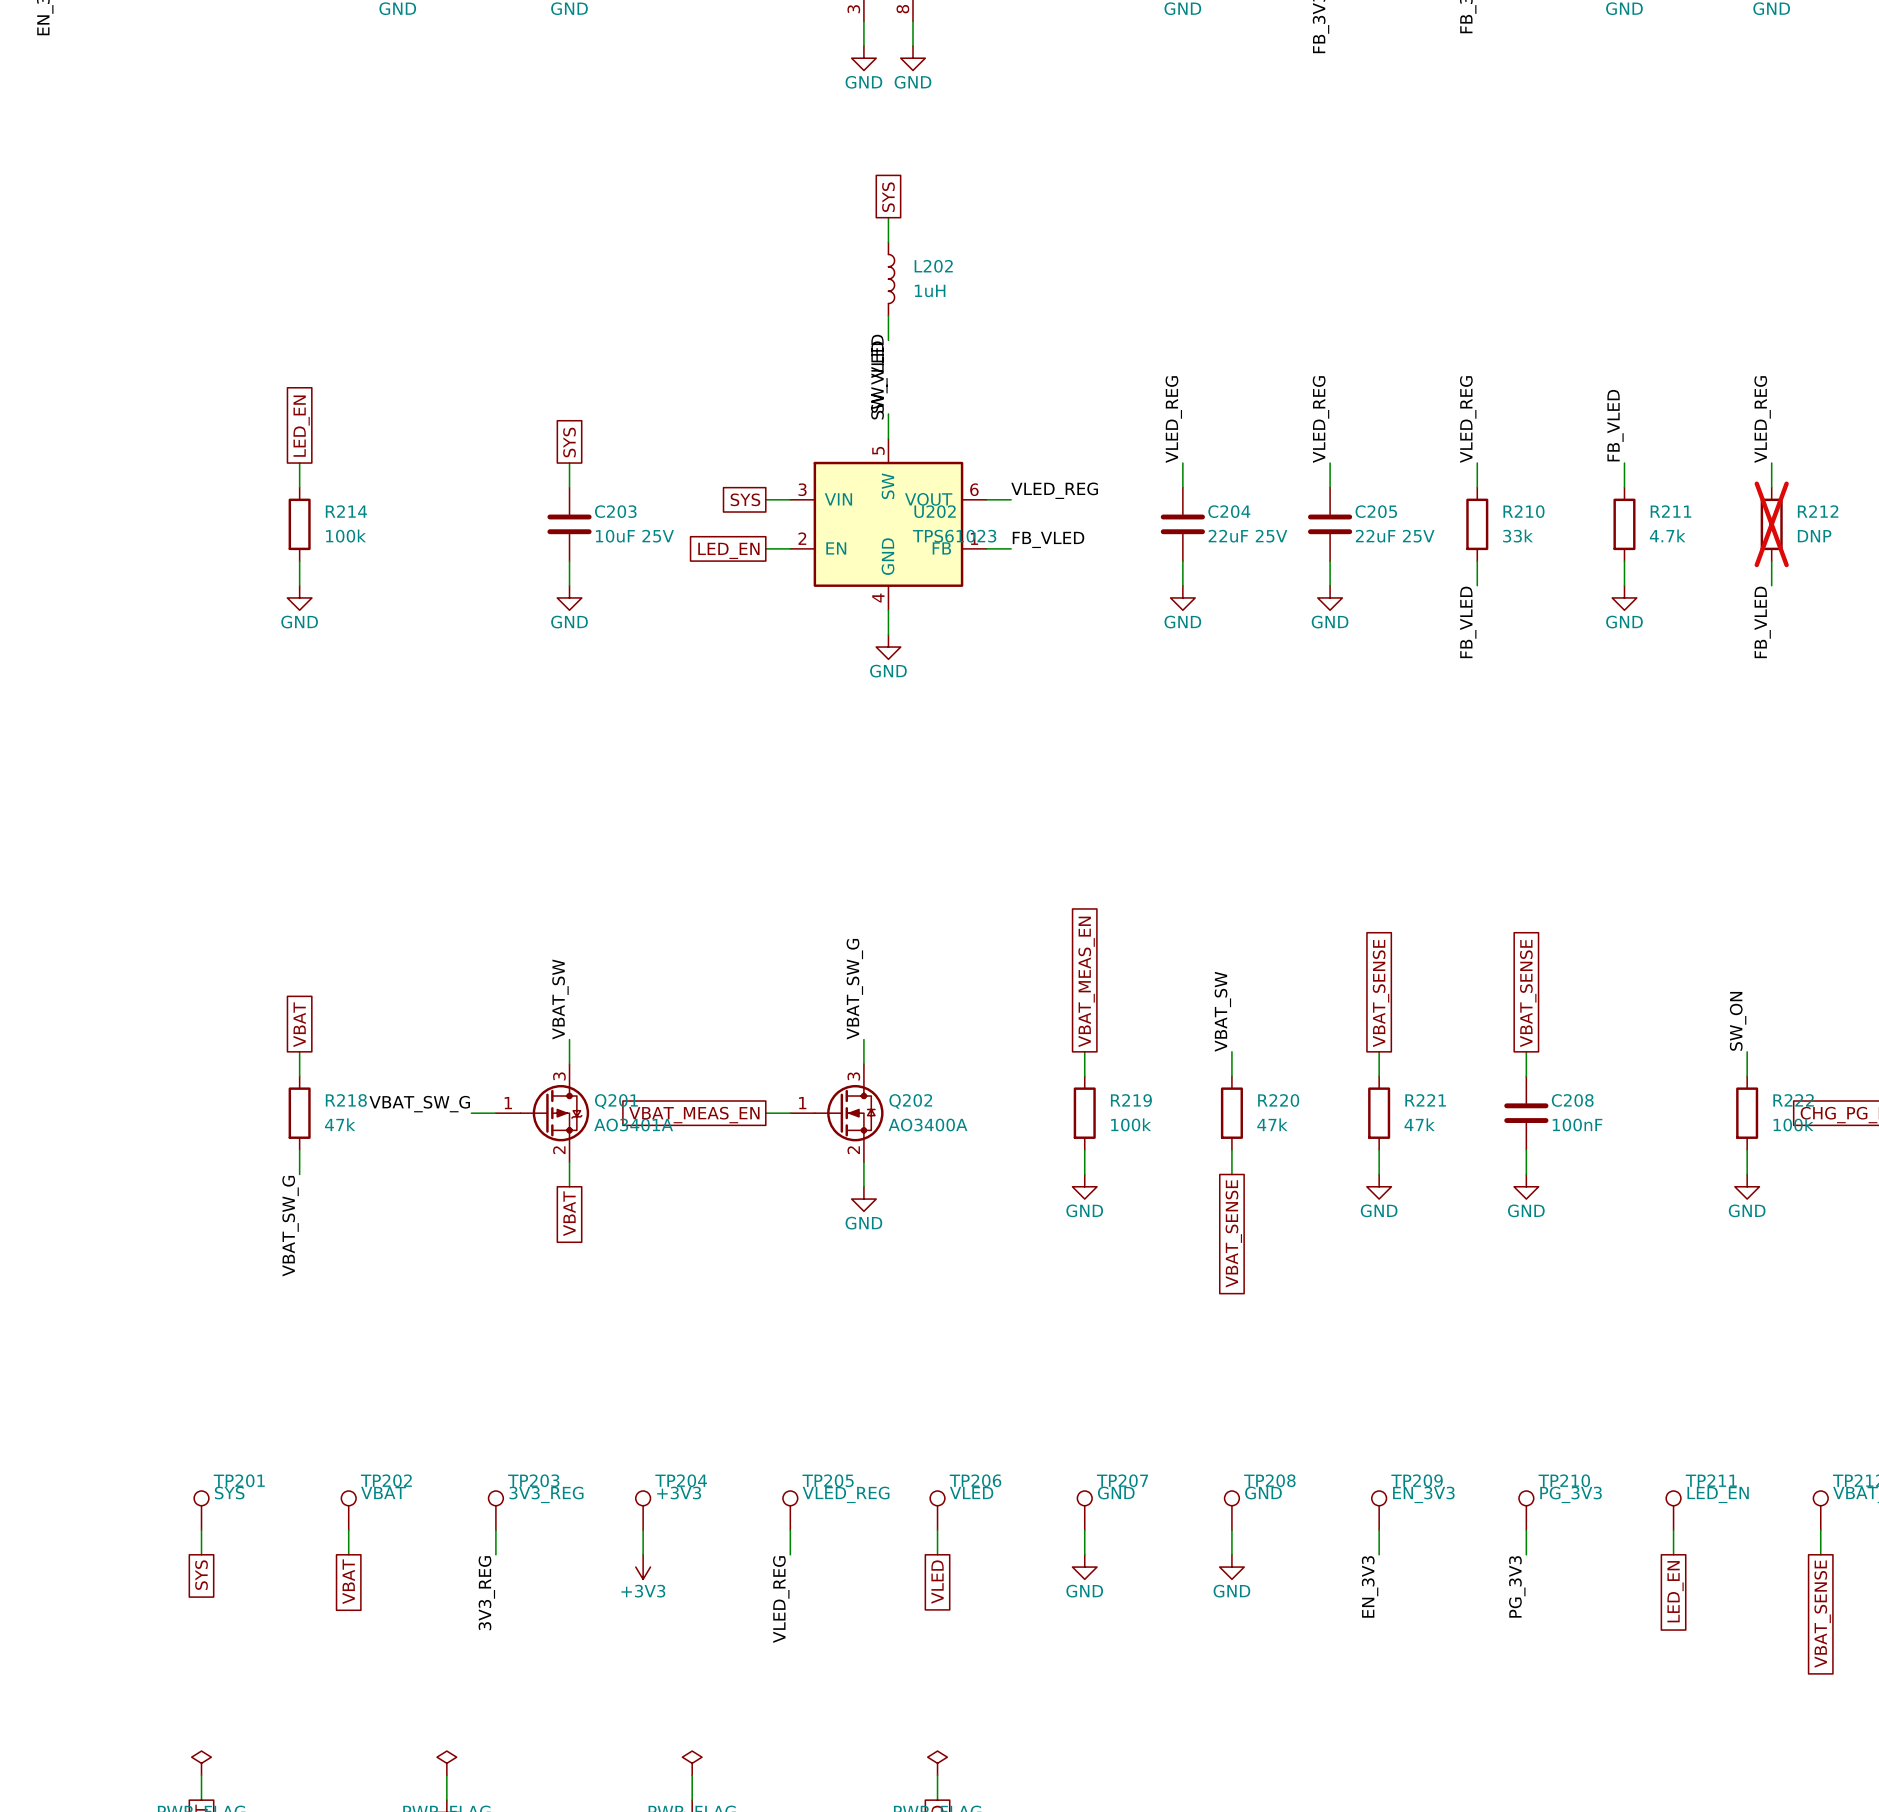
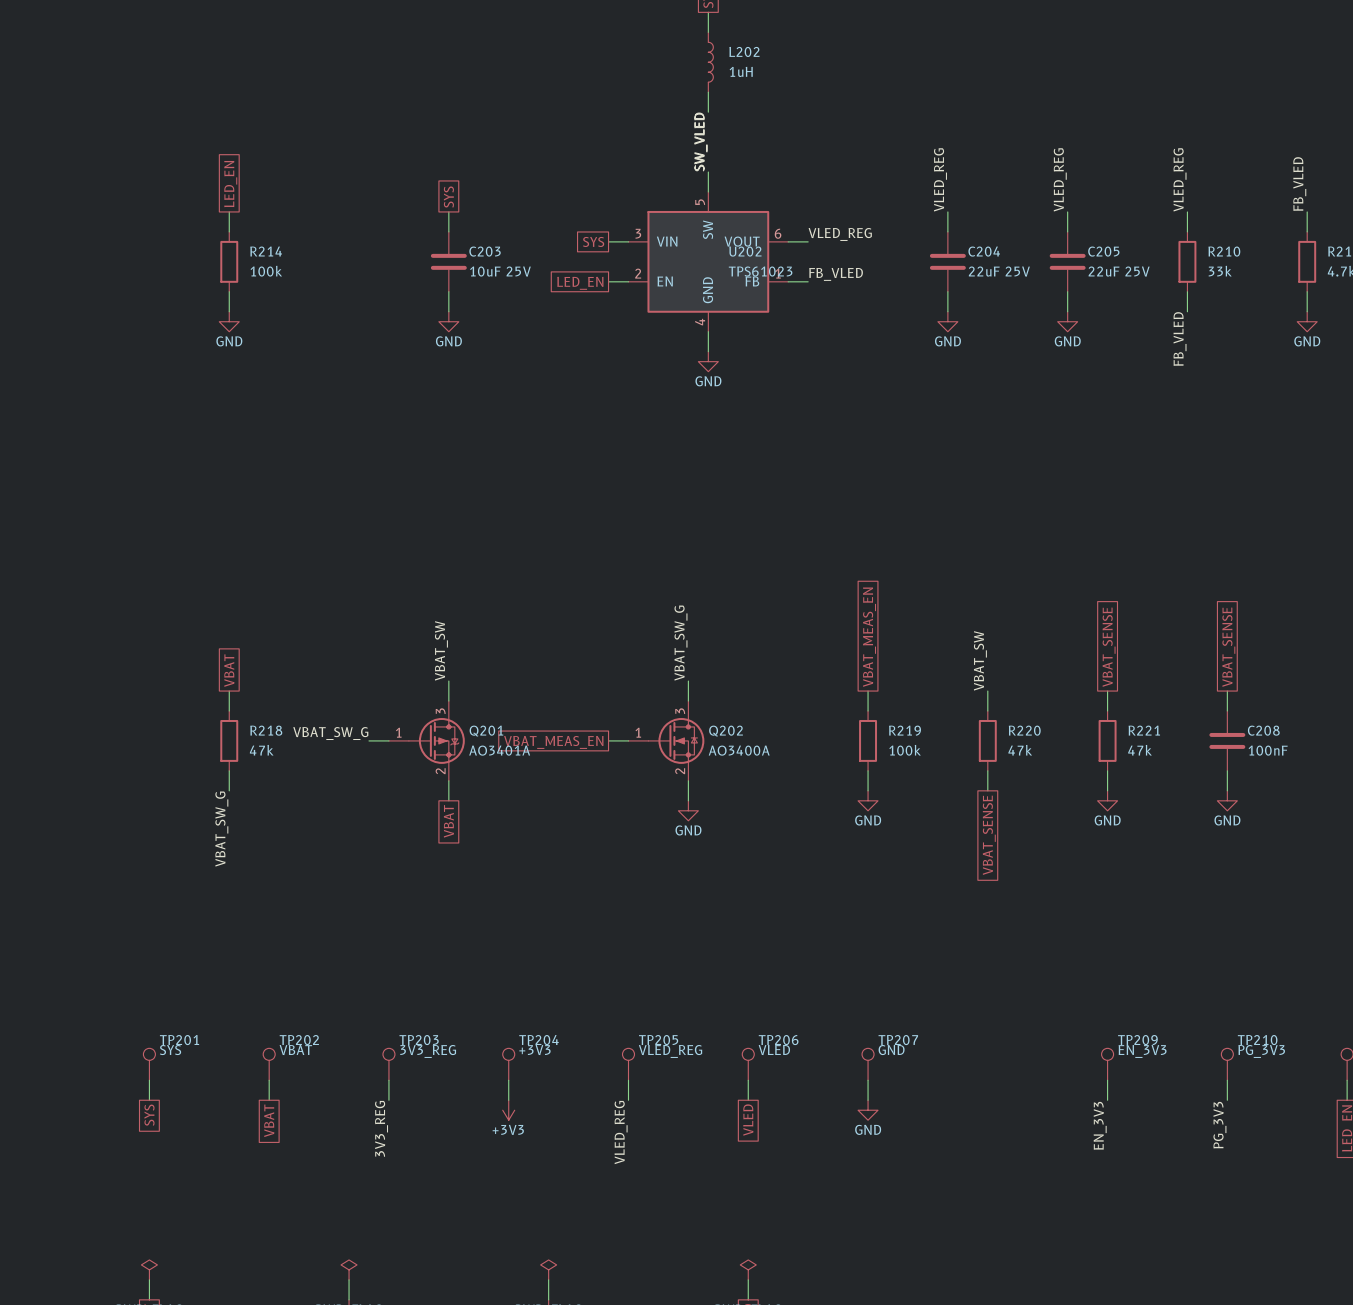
TP208: GND (1231, 1510) -> none
wire: (1231, 1530) (1231, 1554) -> none
power symbol: GND (1231, 1567) -> none

